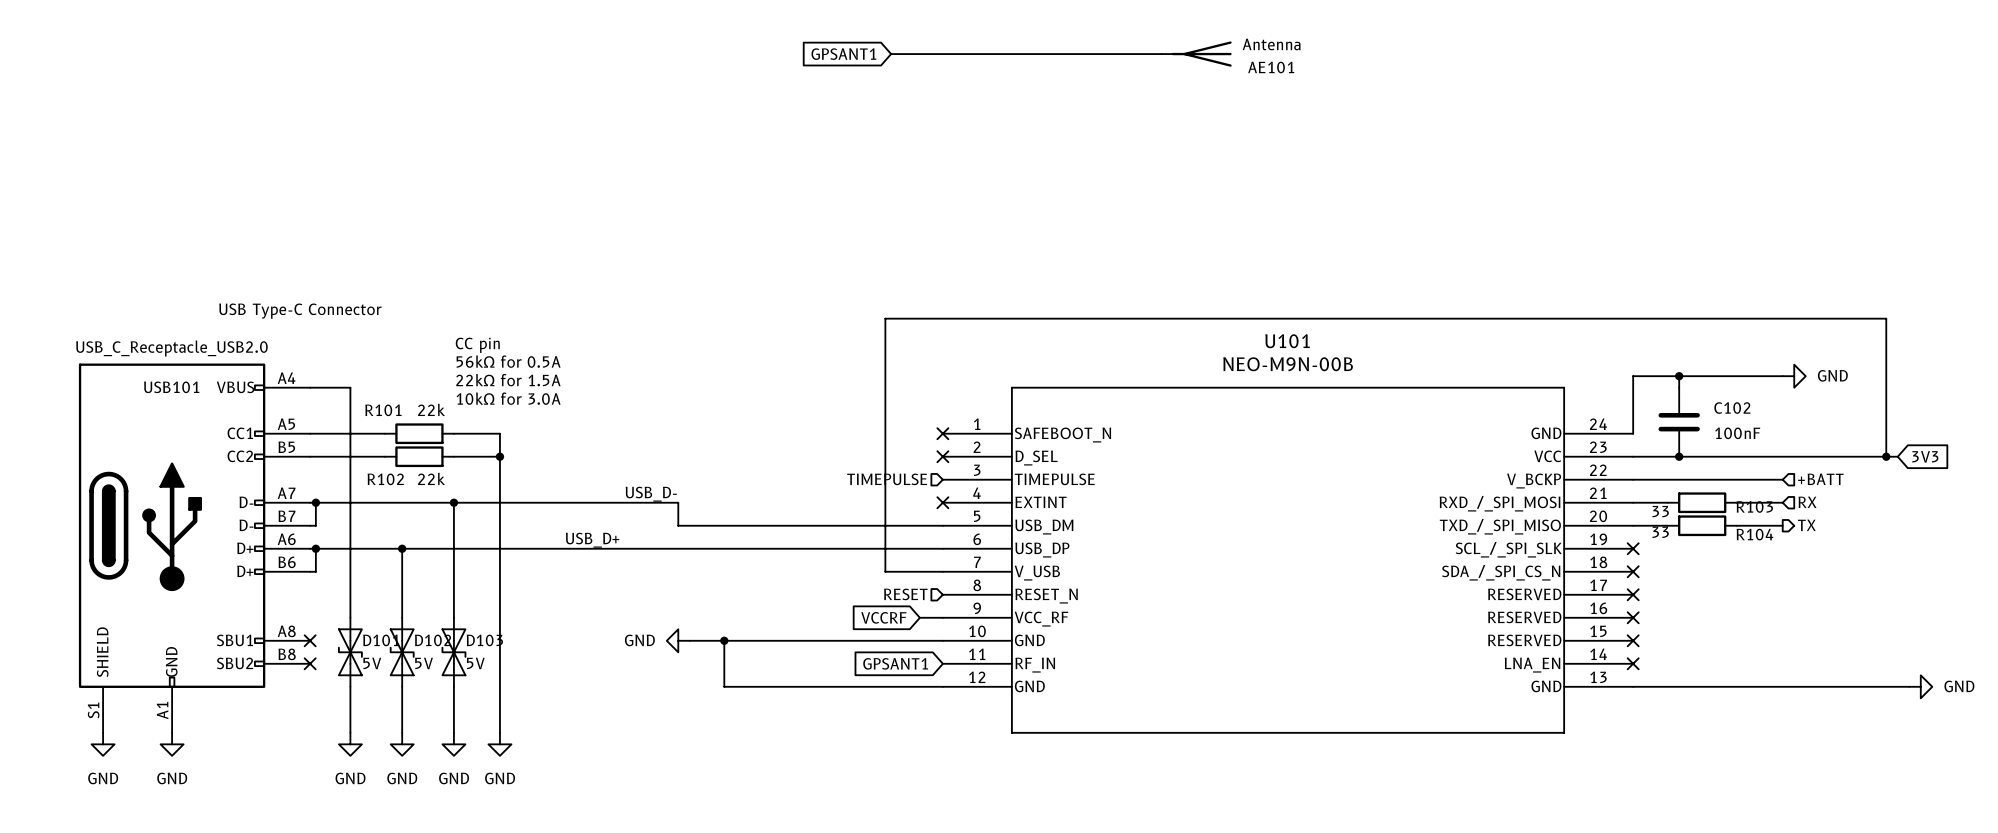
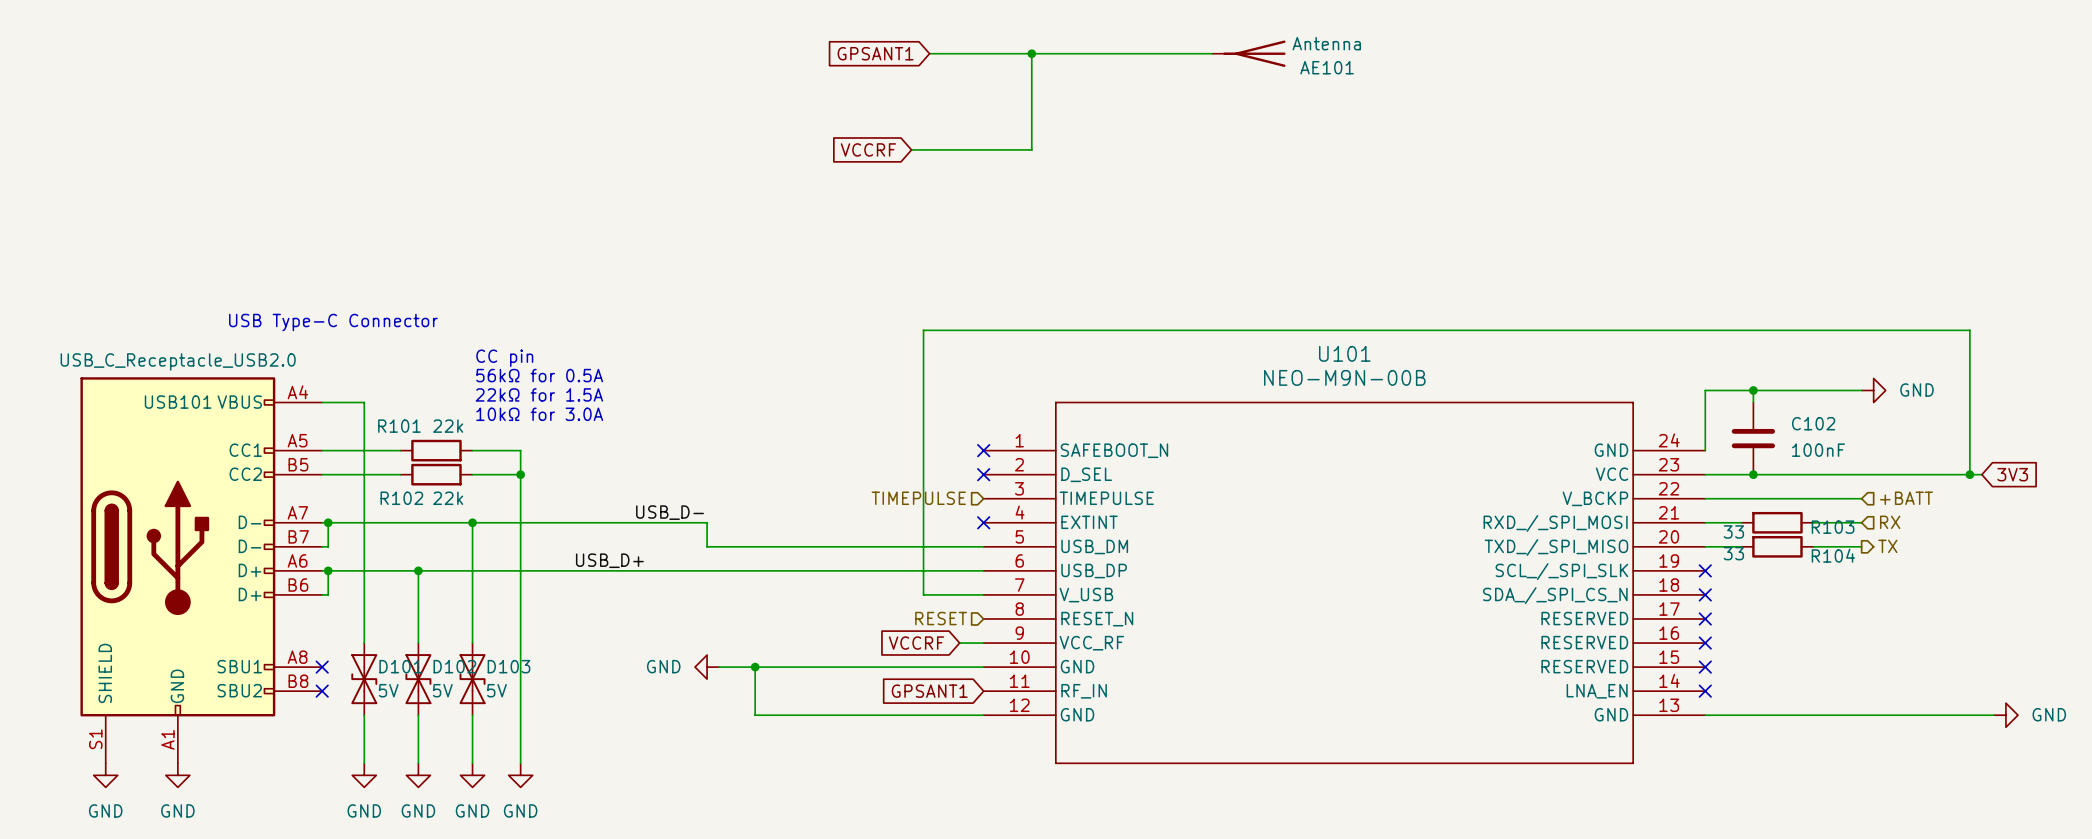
wire: none -> (1031, 53) (1031, 149) (911, 149)
junction: none -> (1031, 53)
global label: none -> VCCRF (868, 149)

